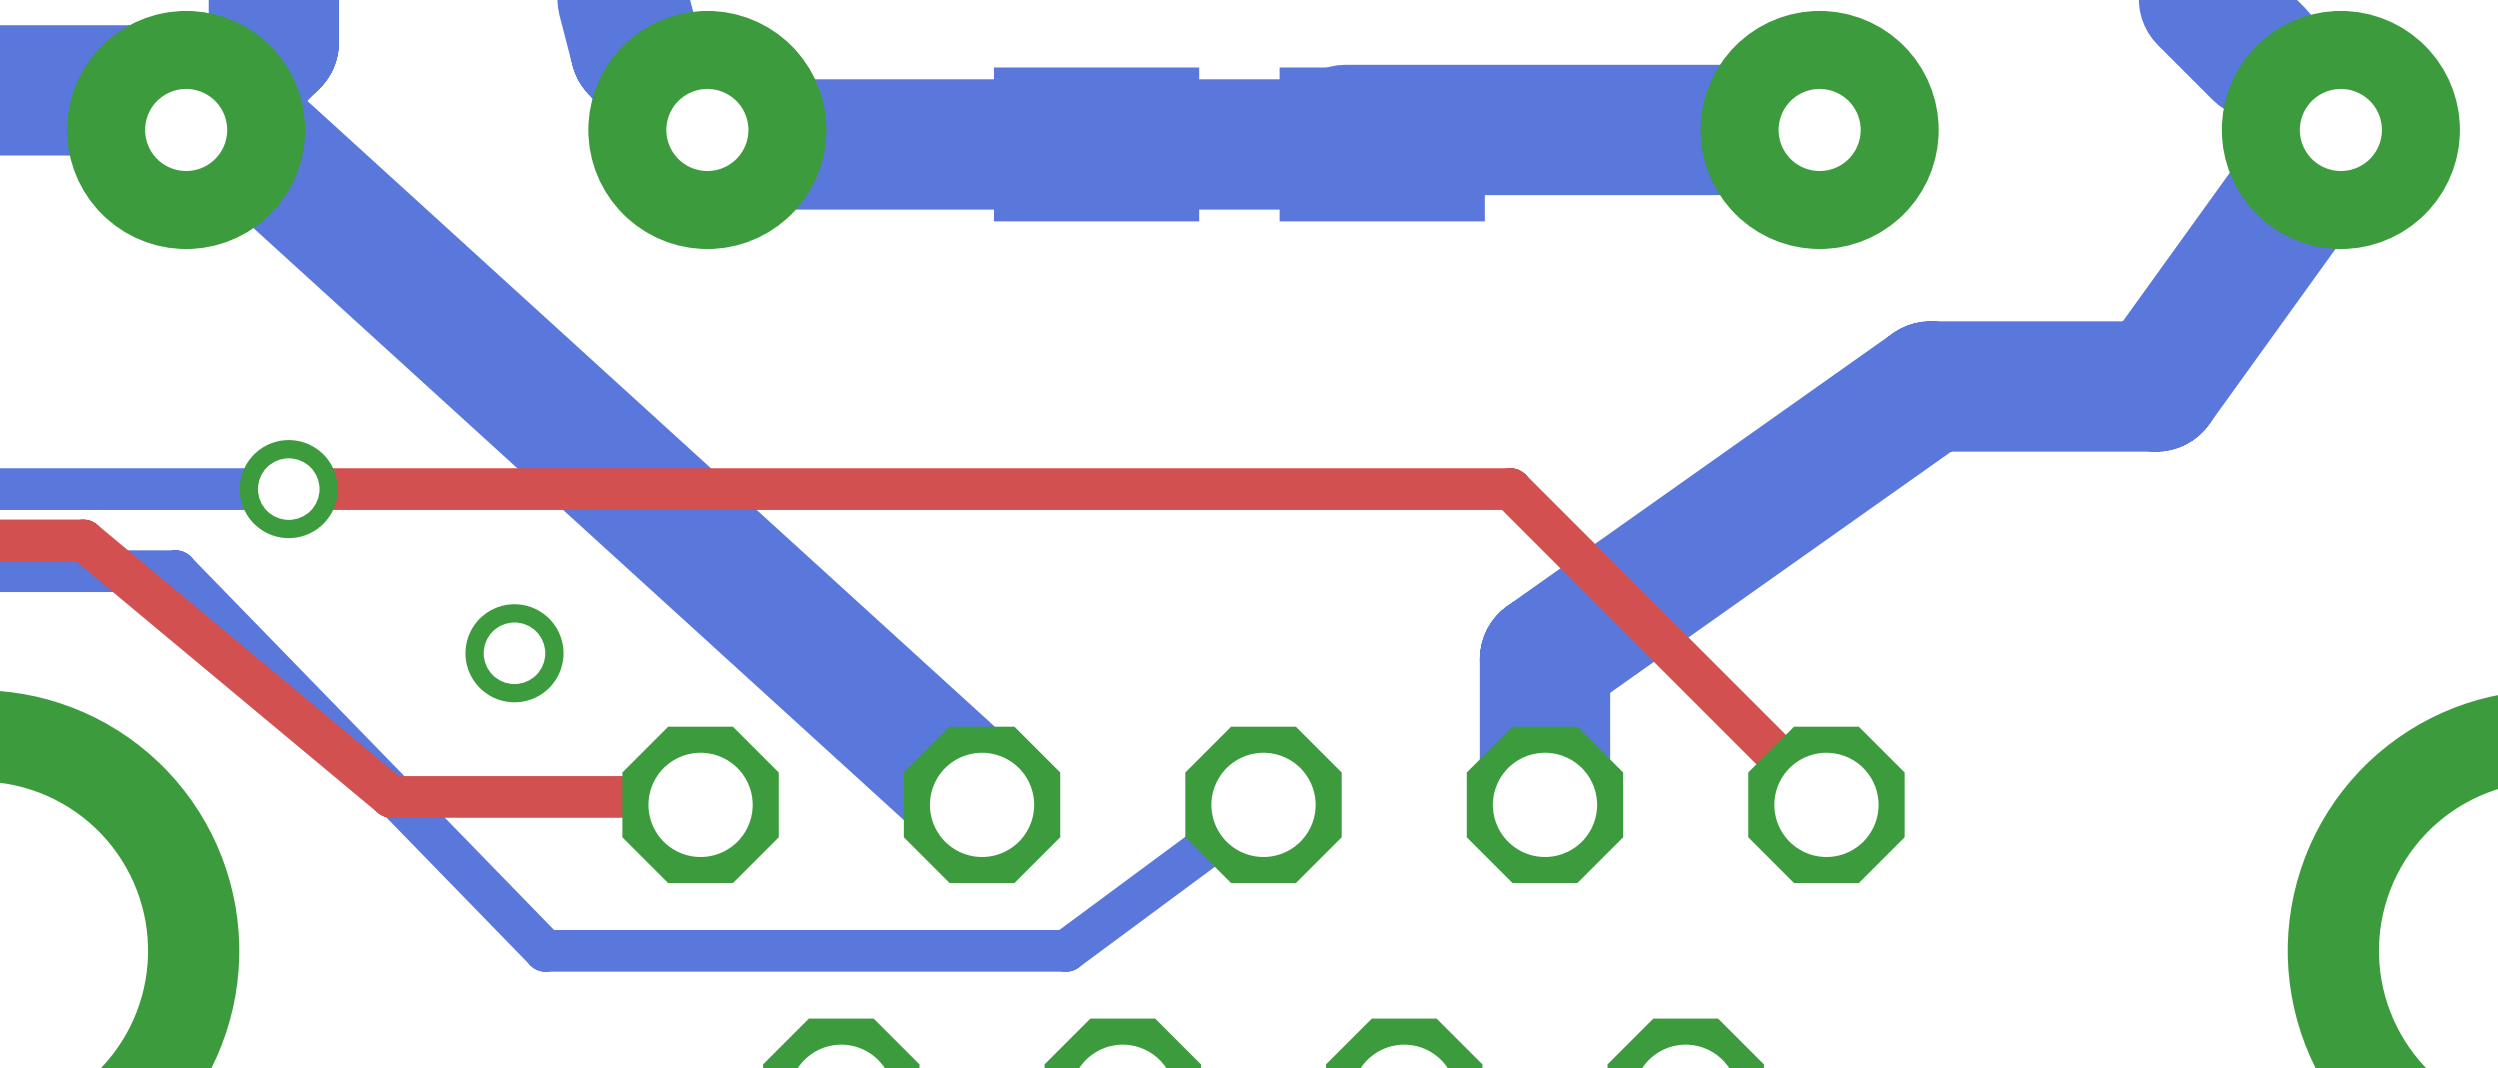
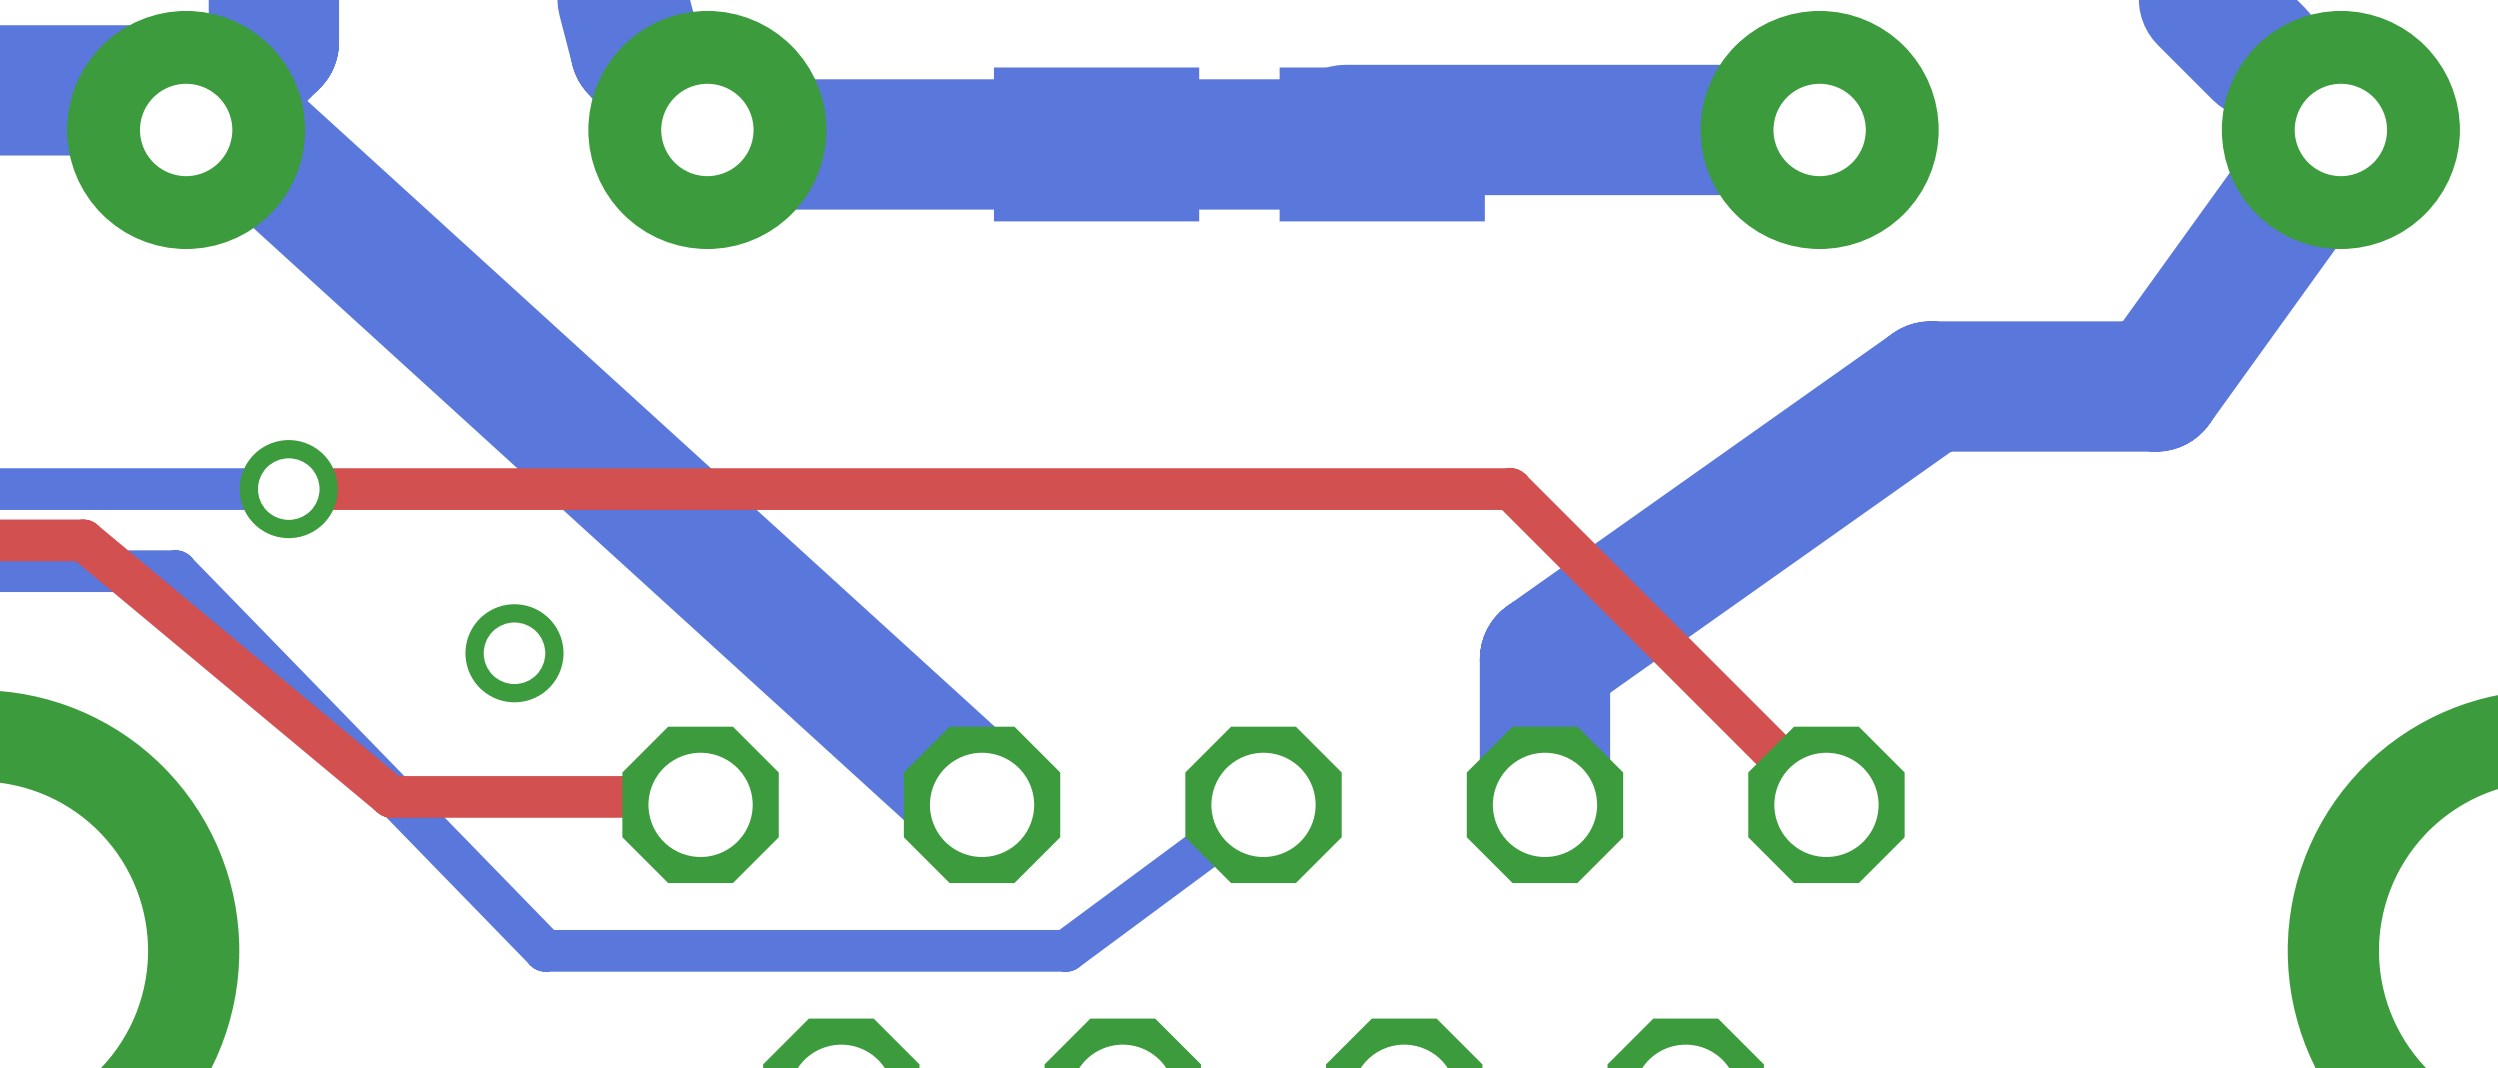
part footprint: [67, 10, 827, 250] -> [67, 10, 827, 250]
part footprint: [1700, 10, 2460, 250] -> [1700, 10, 2460, 250]

